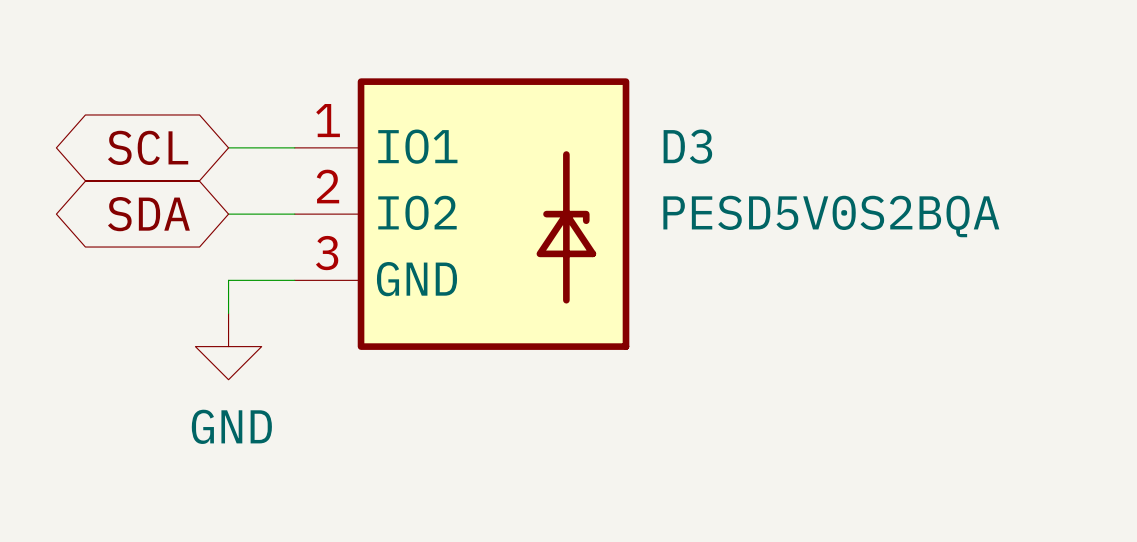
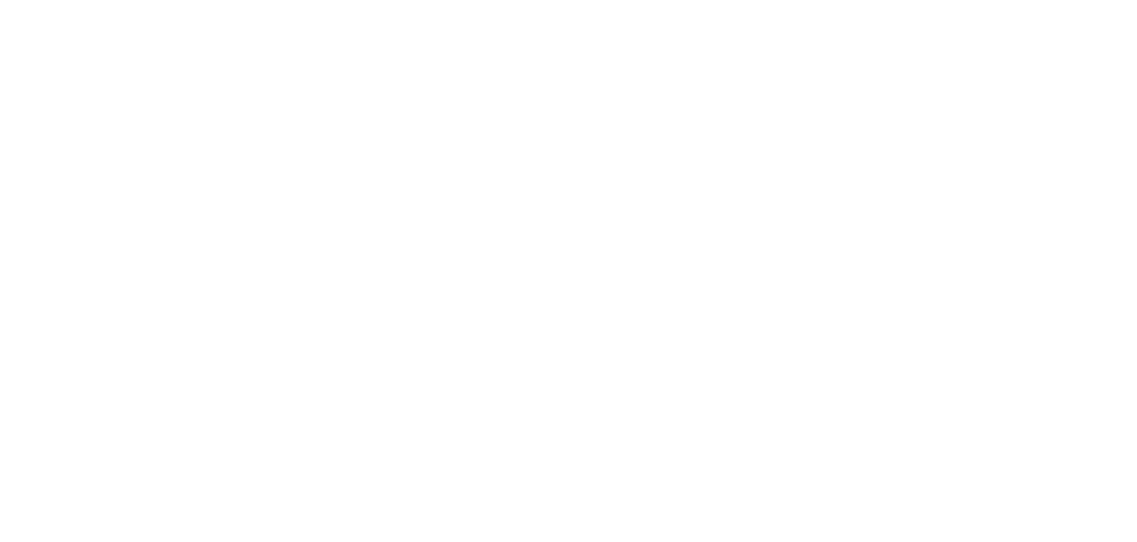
global label: SCL (148, 147) -> none
wire: (228, 147) (294, 147) -> none
global label: SDA (148, 214) -> none
wire: (228, 214) (294, 214) -> none
D3: (462, 214) -> none
wire: (294, 280) (228, 280) (228, 313) -> none
power symbol: GND (228, 346) -> none

